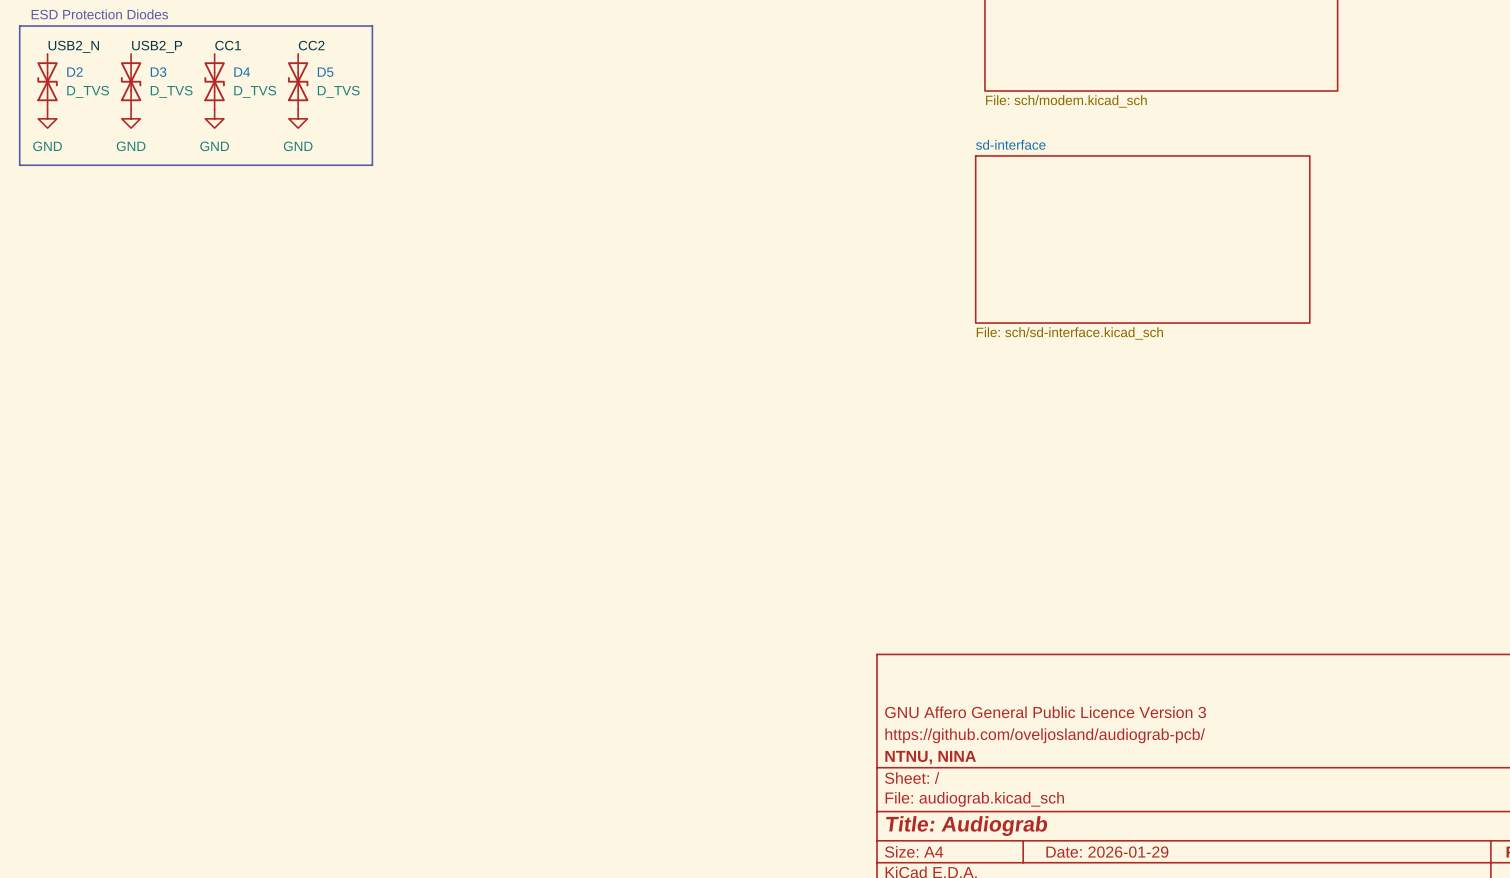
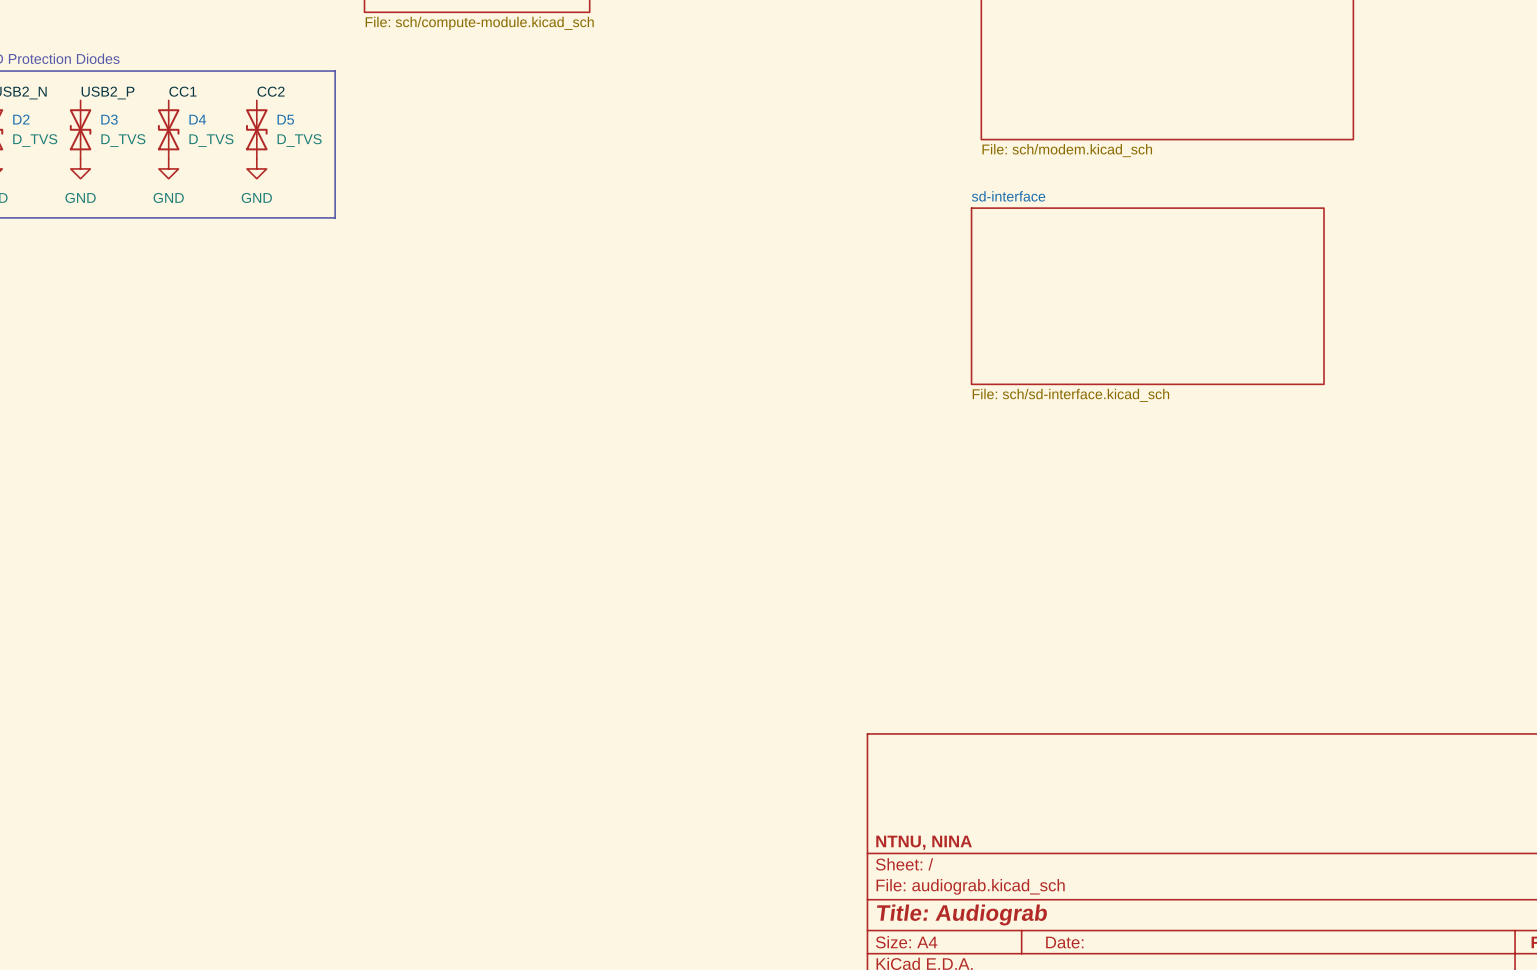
title block: GNU Affero General Public Licence Version 3 (1045, 712) -> none
title block: https://github.com/oveljosland/audiograb-pcb/ (1045, 735) -> none
title block: Date: 2026-01-29 (1107, 852) -> Date: (1064, 942)

